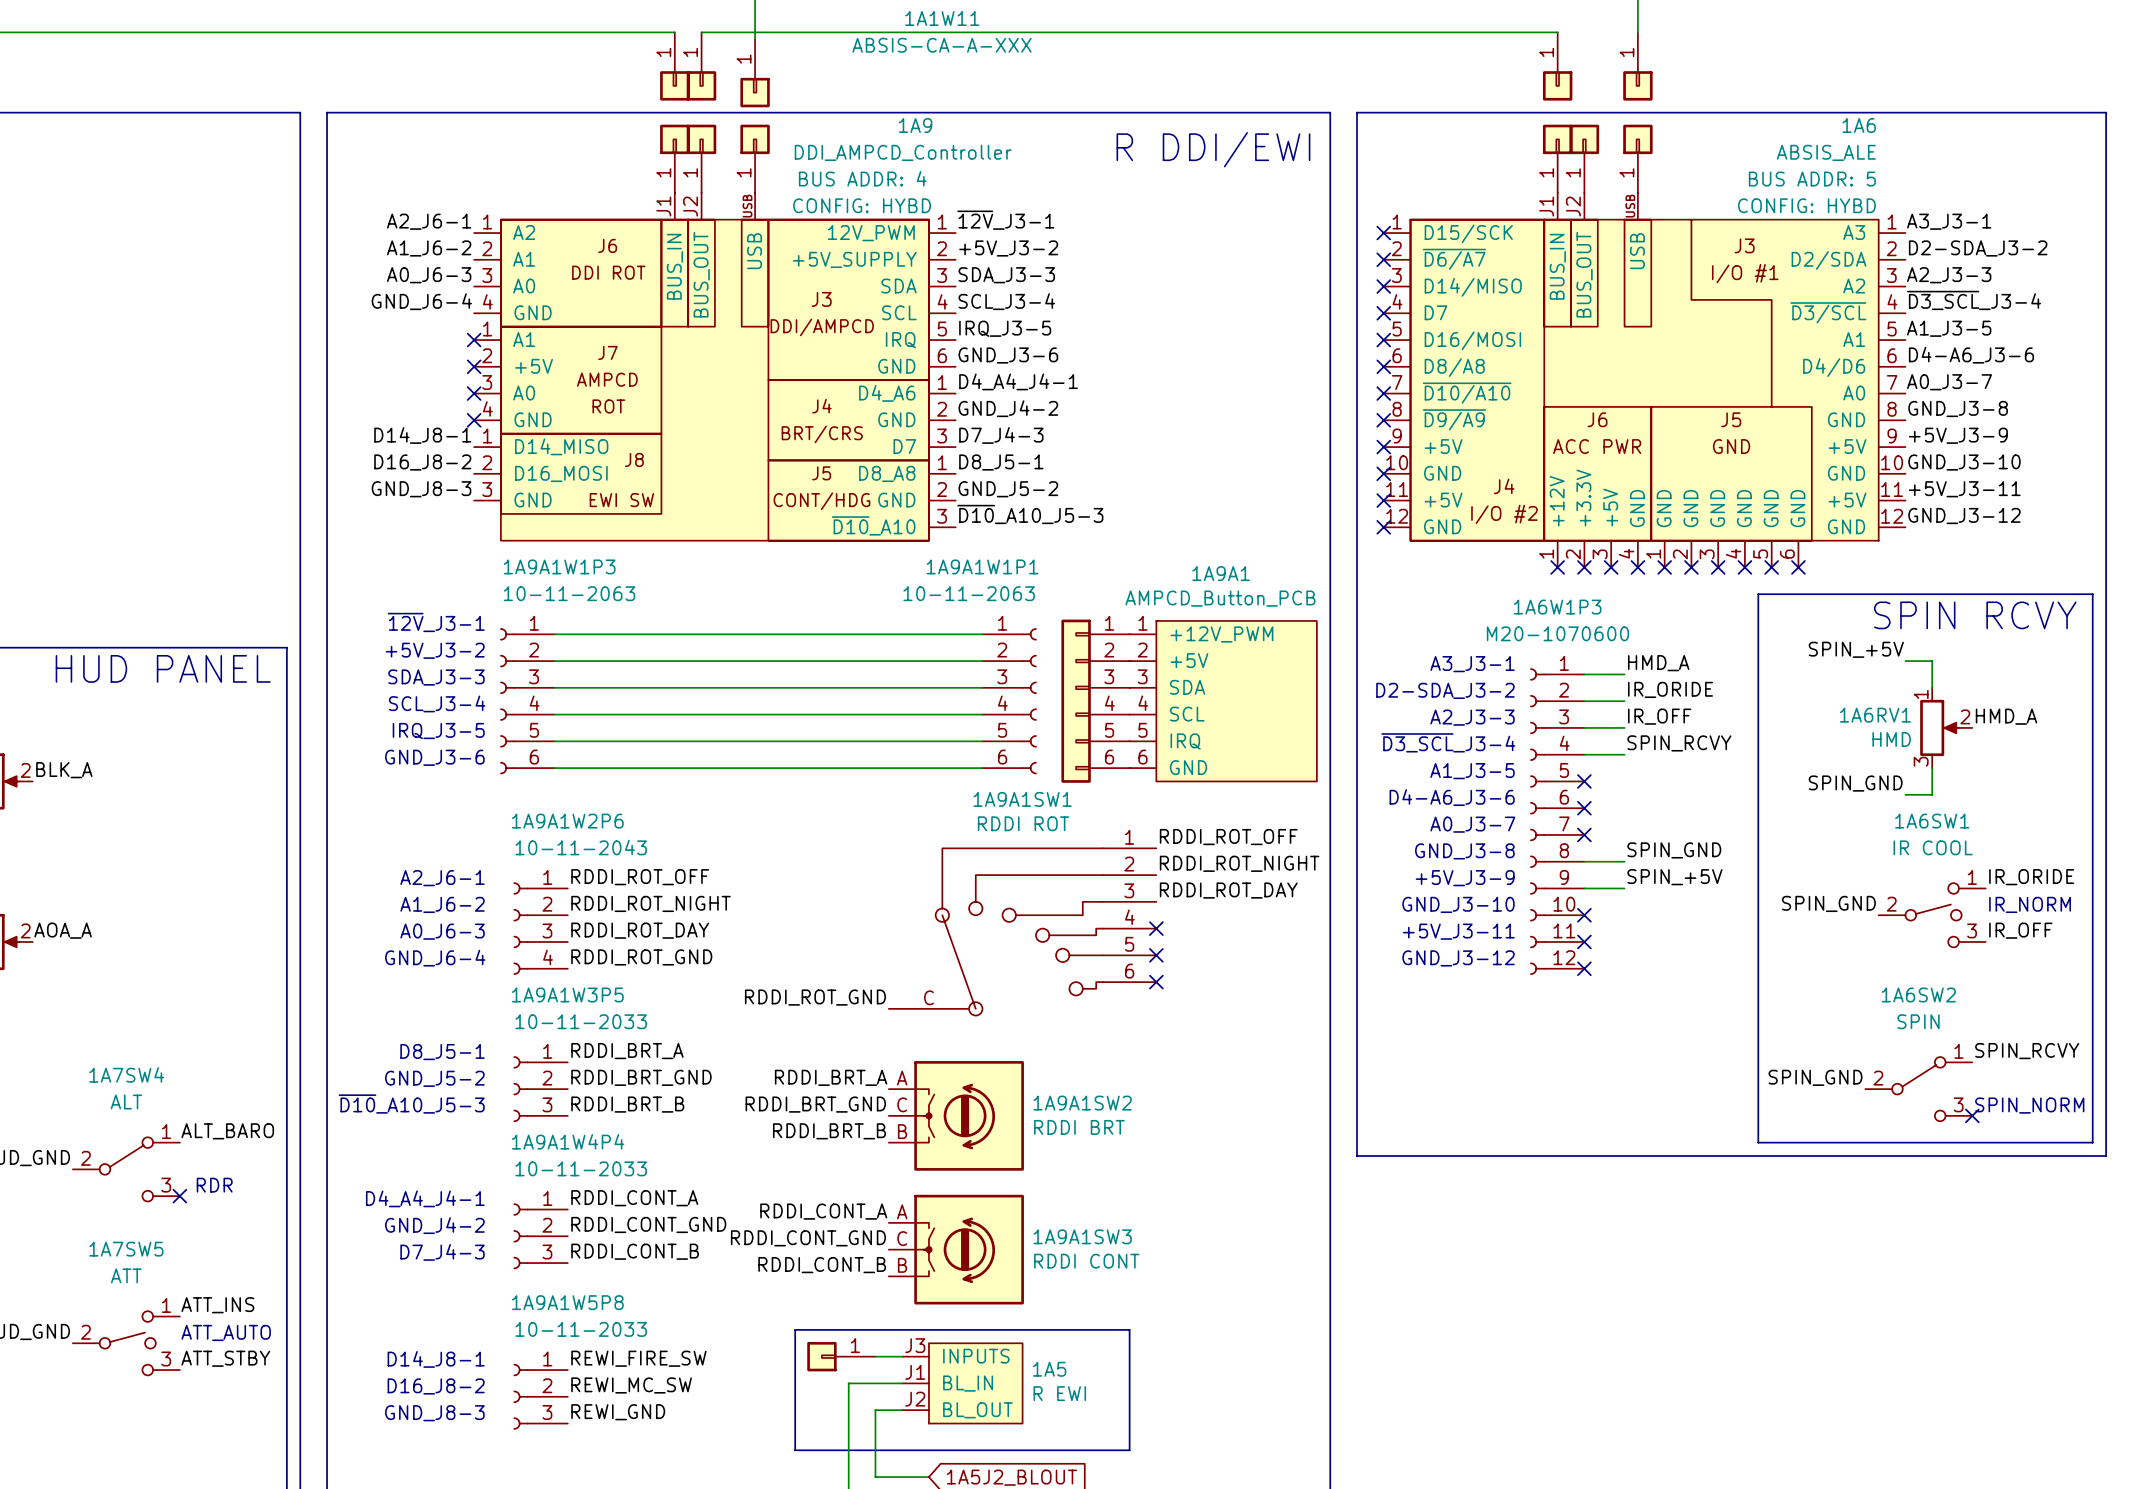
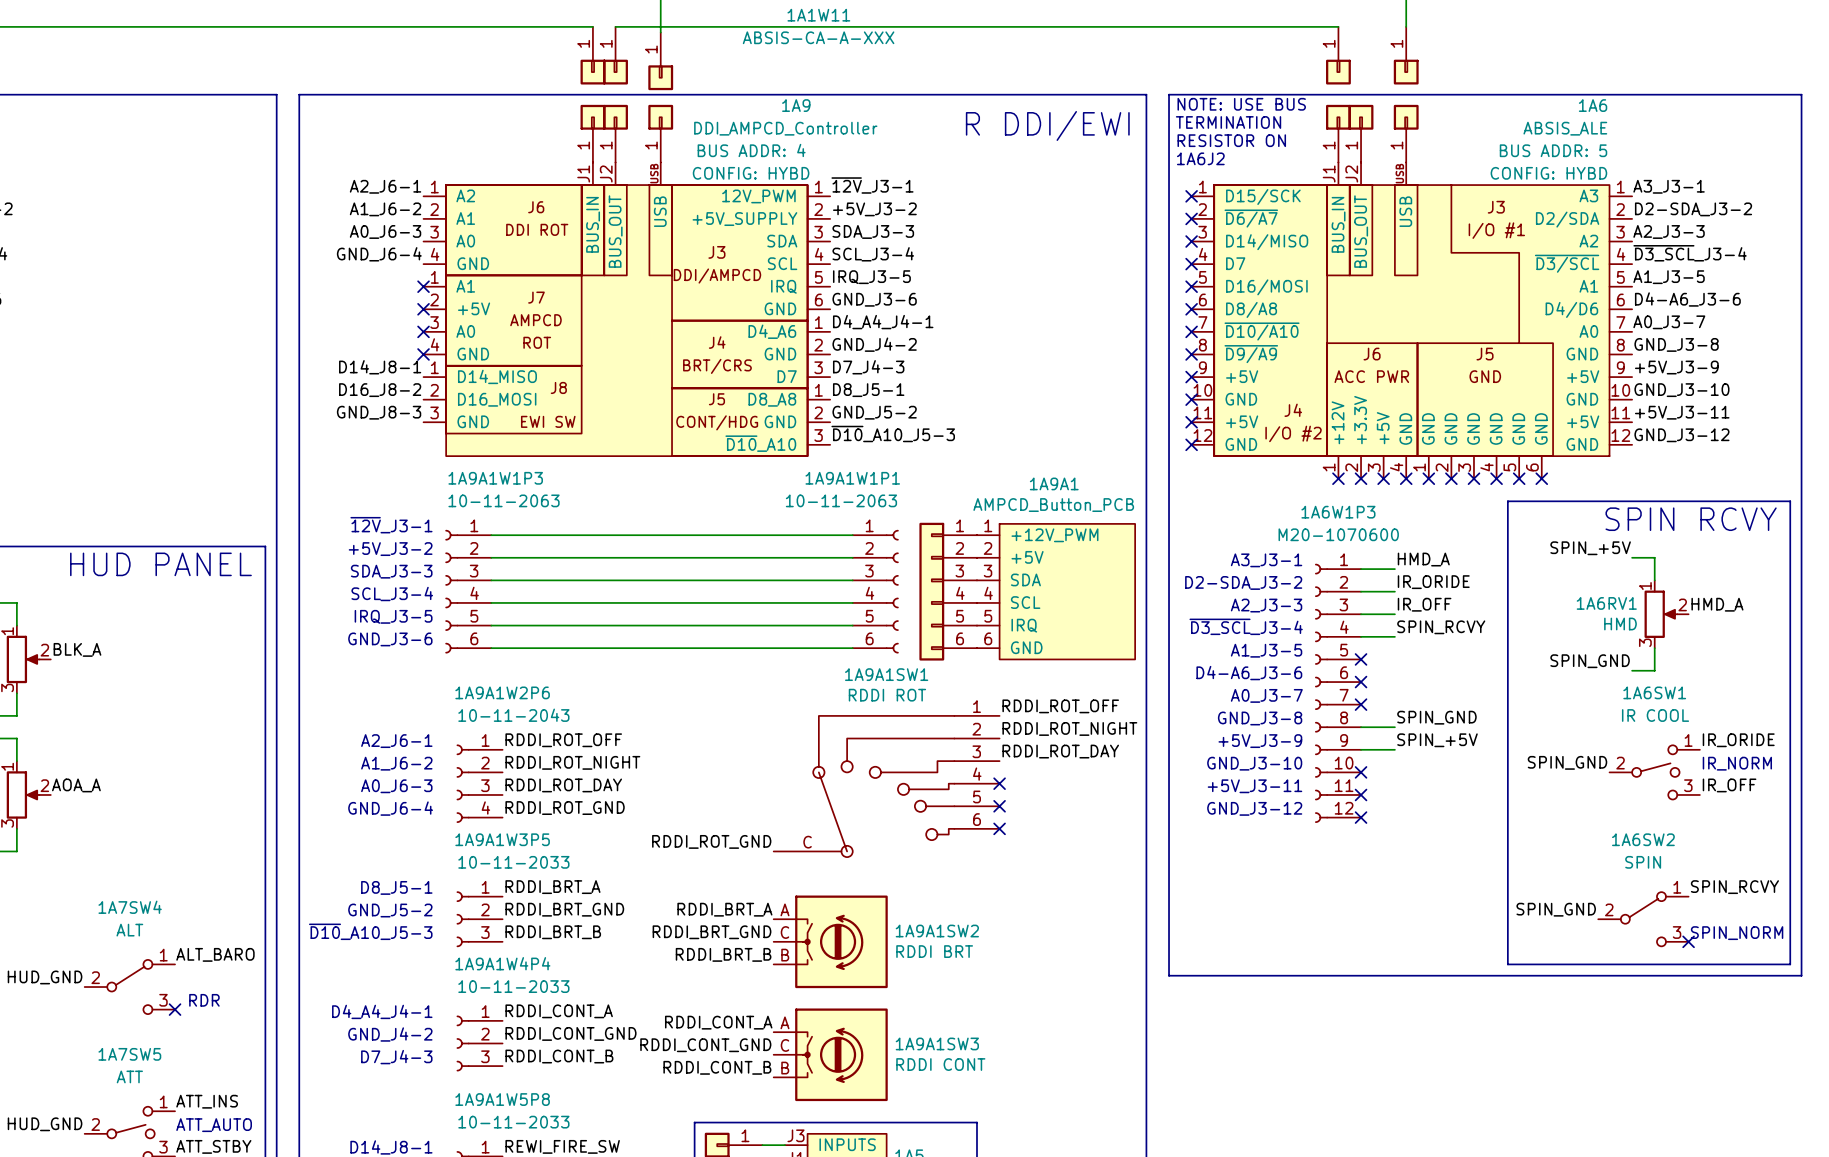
text: none -> NOTE: USE BUS (1241, 104)
text: none -> TERMINATION (1228, 122)
text: none -> RESISTOR ON (1231, 140)
text: none -> 1A6J2 (1200, 158)

